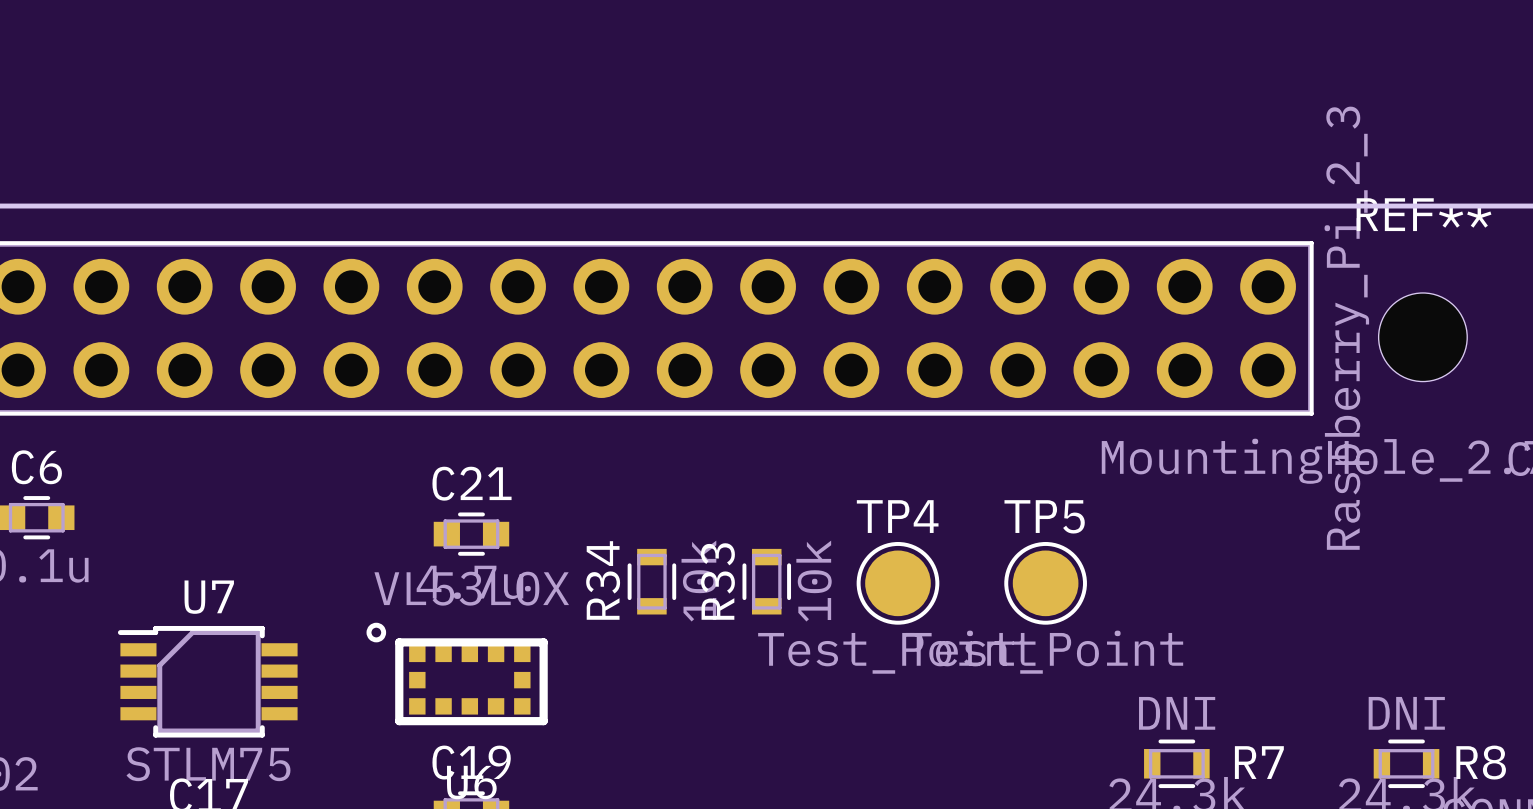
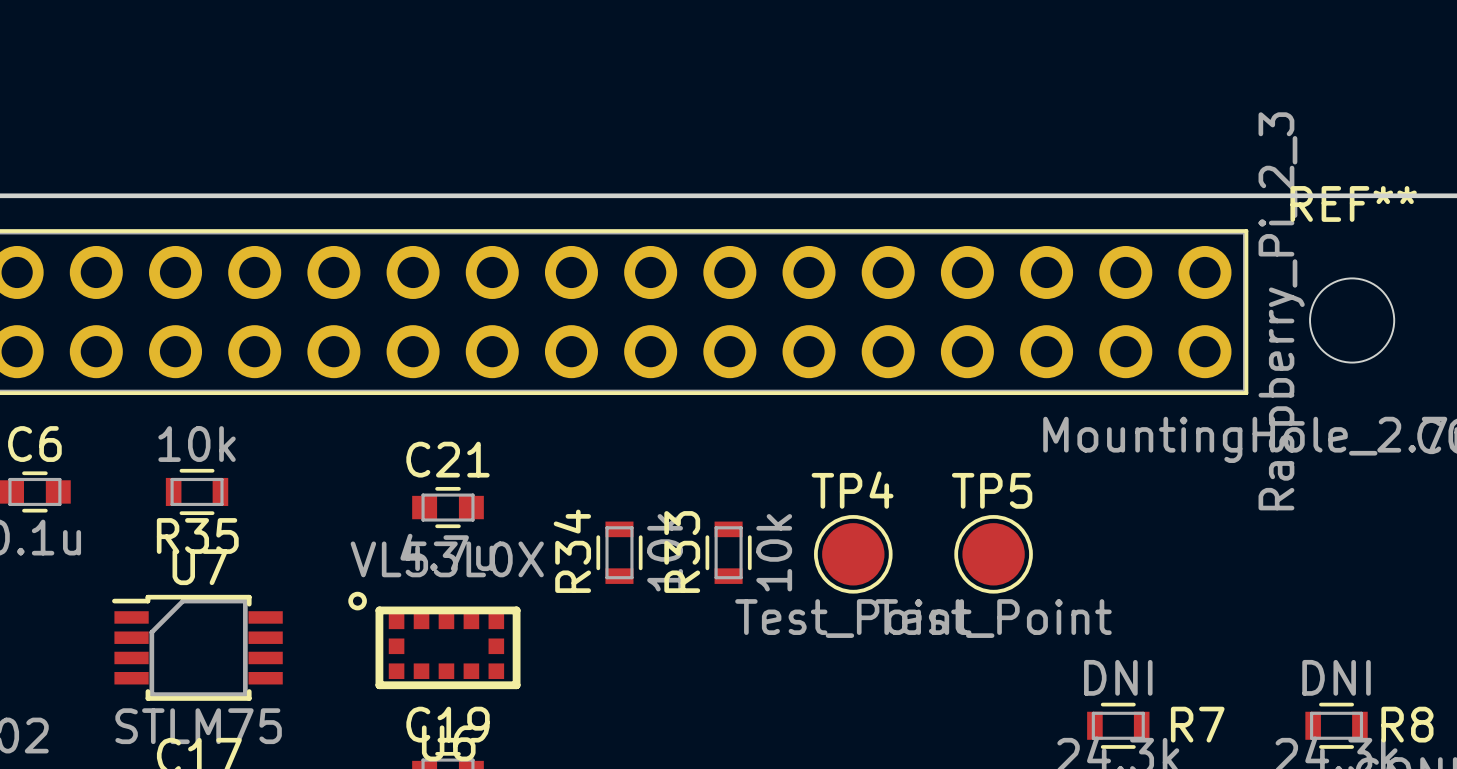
R35: none -> 10k (197, 491)

